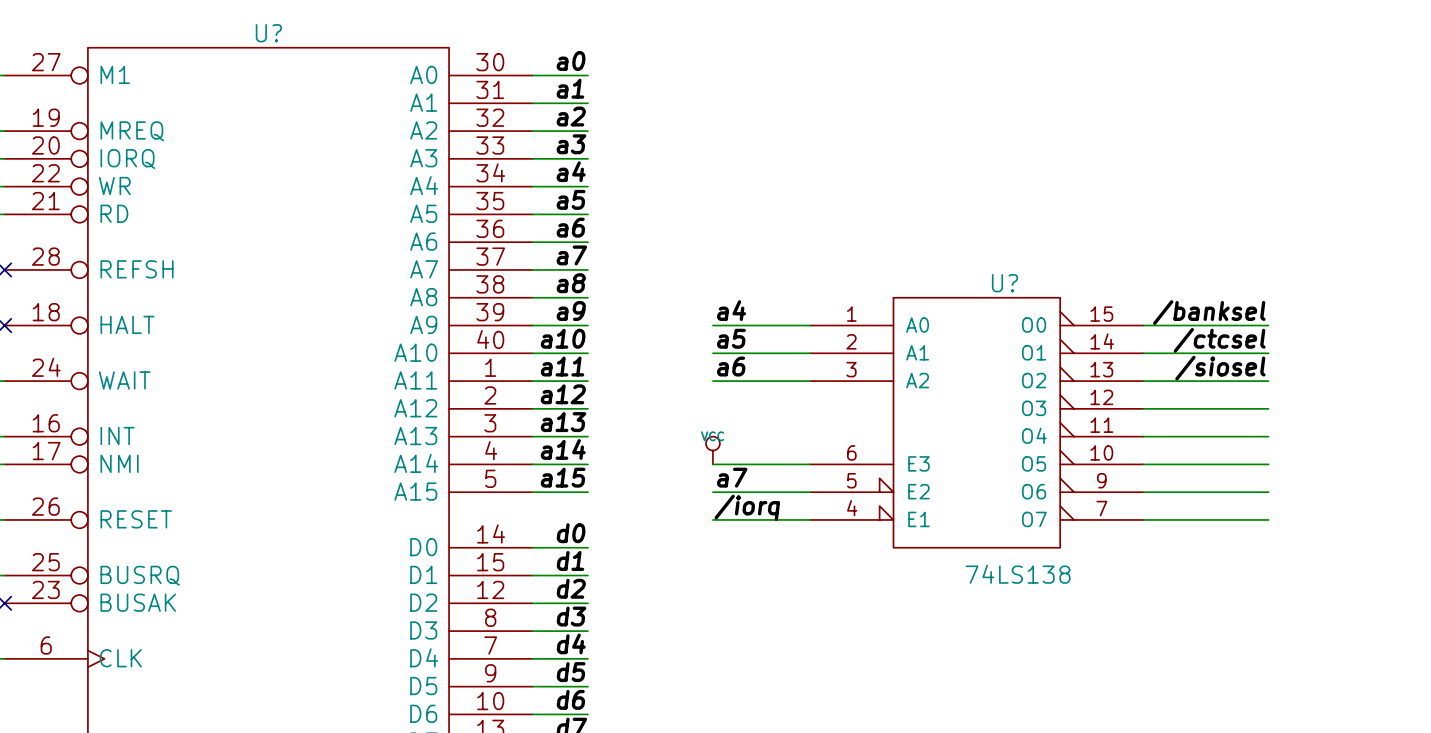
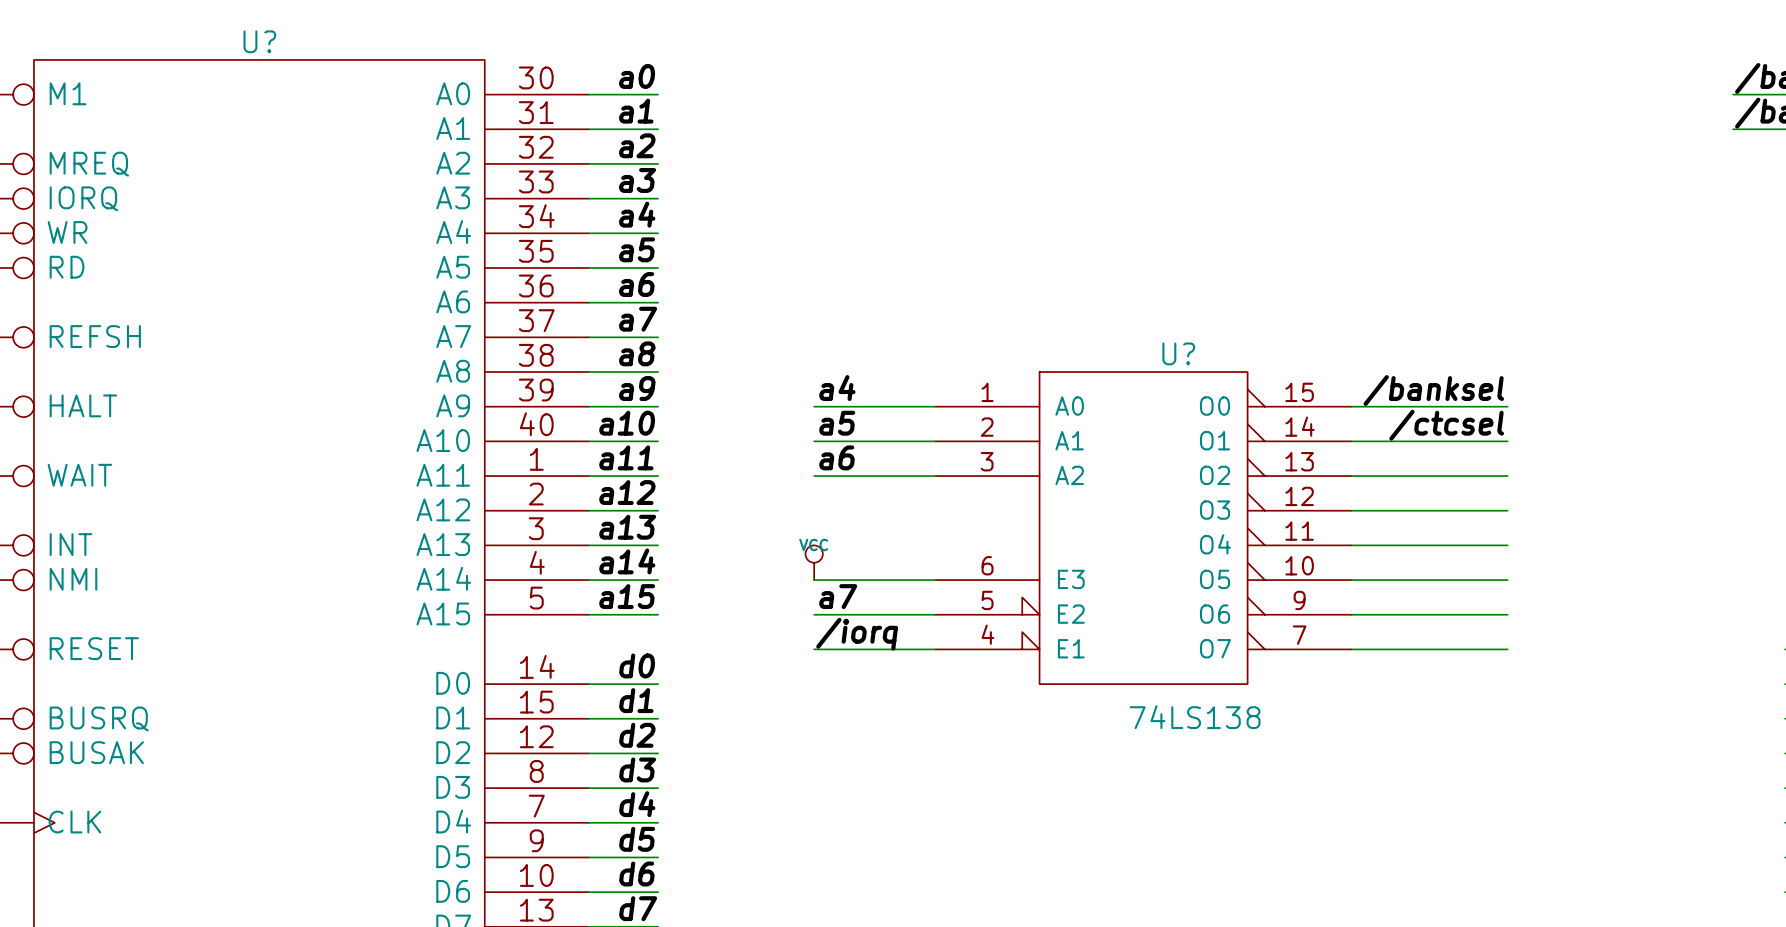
label: /siosel (1220, 368) -> none

